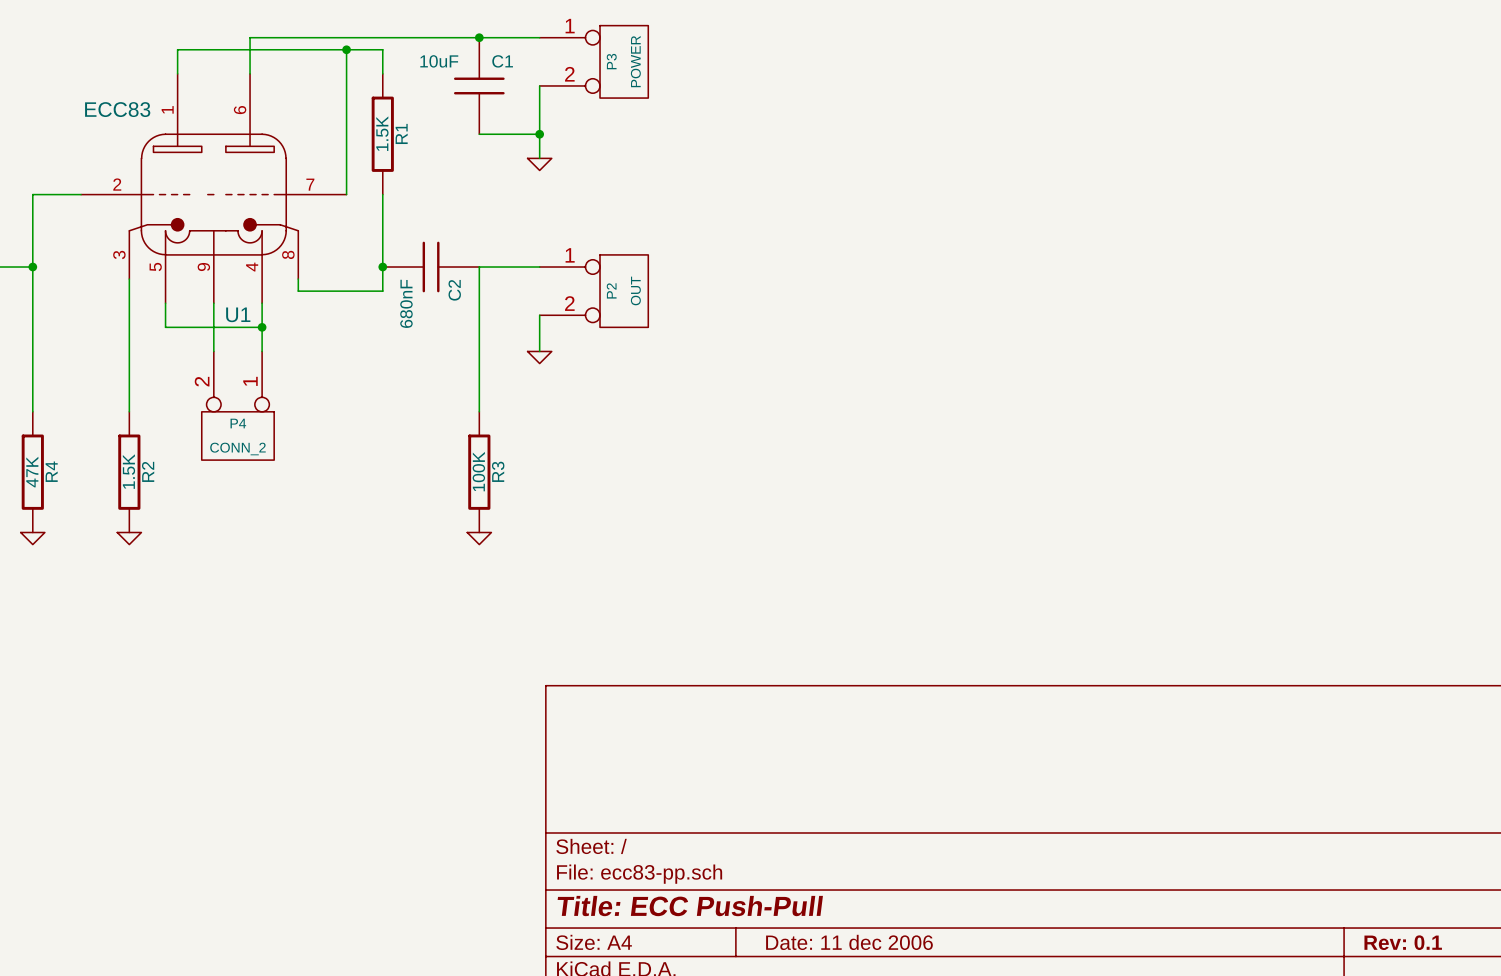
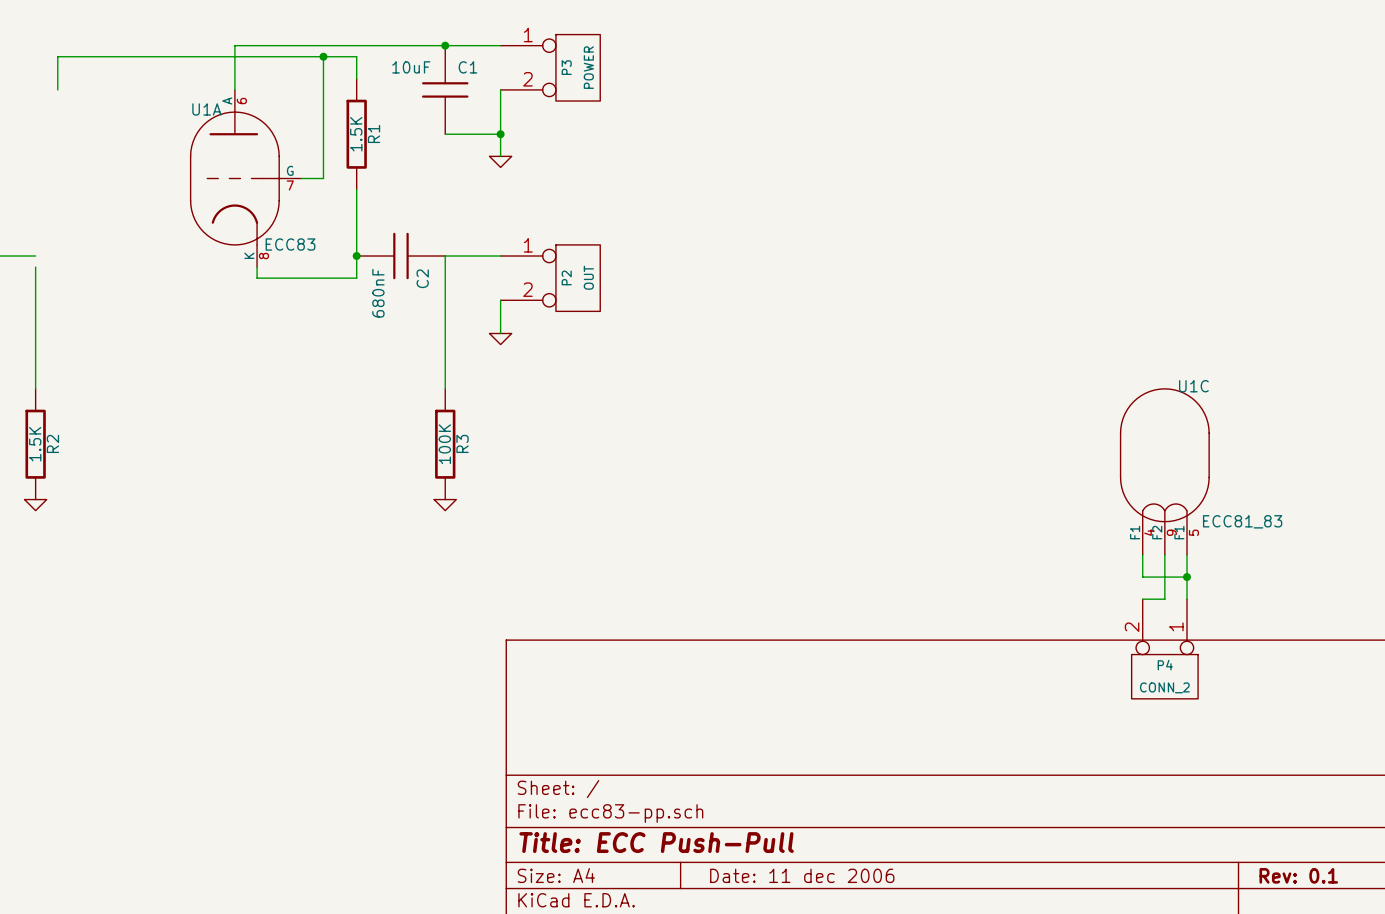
wire: (177, 49) (177, 73) -> (168, 56) (57, 56) (57, 89)
U1A: none -> ECC83 (245, 178)
wire: (346, 182) (346, 194) -> (323, 178) (301, 178)
U1: ECC83 (213, 188) -> none
wire: (81, 194) (32, 194) (32, 279) -> none
junction: (32, 267) -> none
wire: (129, 279) (129, 411) -> none
wire: (298, 279) (298, 291) -> (257, 267) (257, 278) (279, 278)
wire: (165, 303) (165, 327) (262, 327) -> none
wire: (213, 303) (213, 351) -> none
wire: (262, 303) (262, 351) -> none
junction: (262, 327) -> none
P4 position: (237, 405) -> (1164, 649)
R4 name: R4 (51, 471) -> R2 (52, 443)
R4 value: 47K (32, 472) -> 1.5K (35, 444)
R2: 1.5K (129, 472) -> none
U1C: none -> ECC81_83 (1164, 471)
power symbol: (129, 538) -> none
wire: none -> (1142, 554) (1142, 577) (1186, 577)
wire: none -> (1164, 554) (1164, 599) (1142, 599)
wire: none -> (1186, 554) (1186, 599)
junction: none -> (1186, 577)

